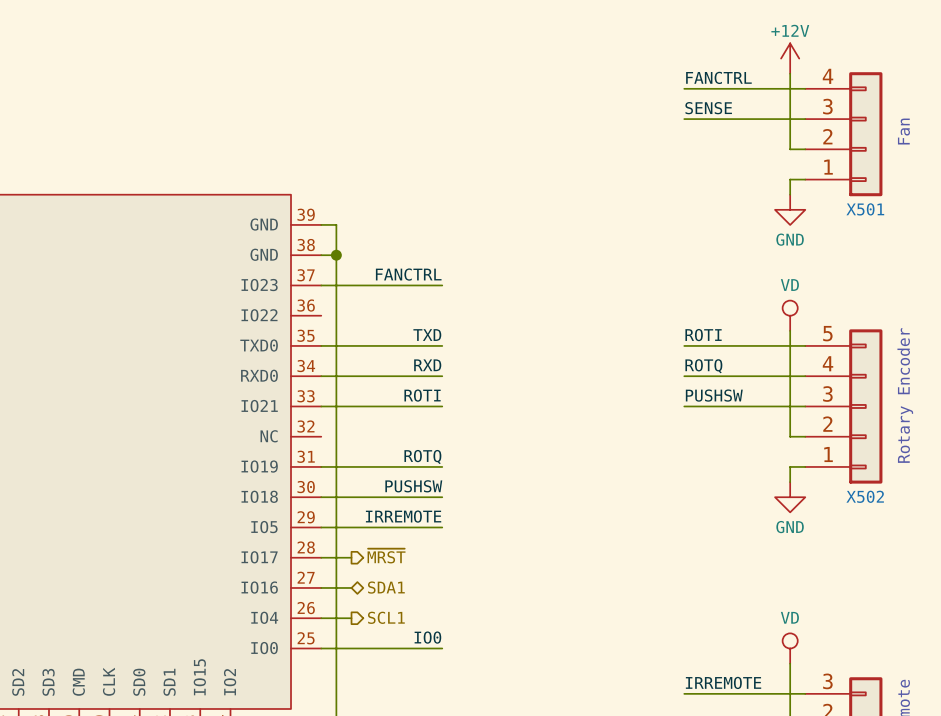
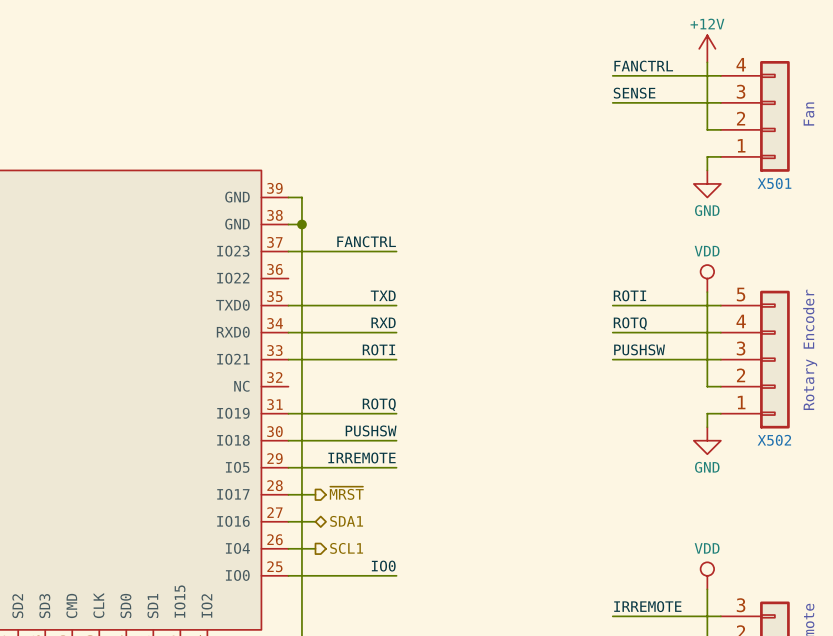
power symbol: VD (790, 315) -> VDD (707, 278)
power symbol: VD (790, 648) -> VDD (707, 575)

